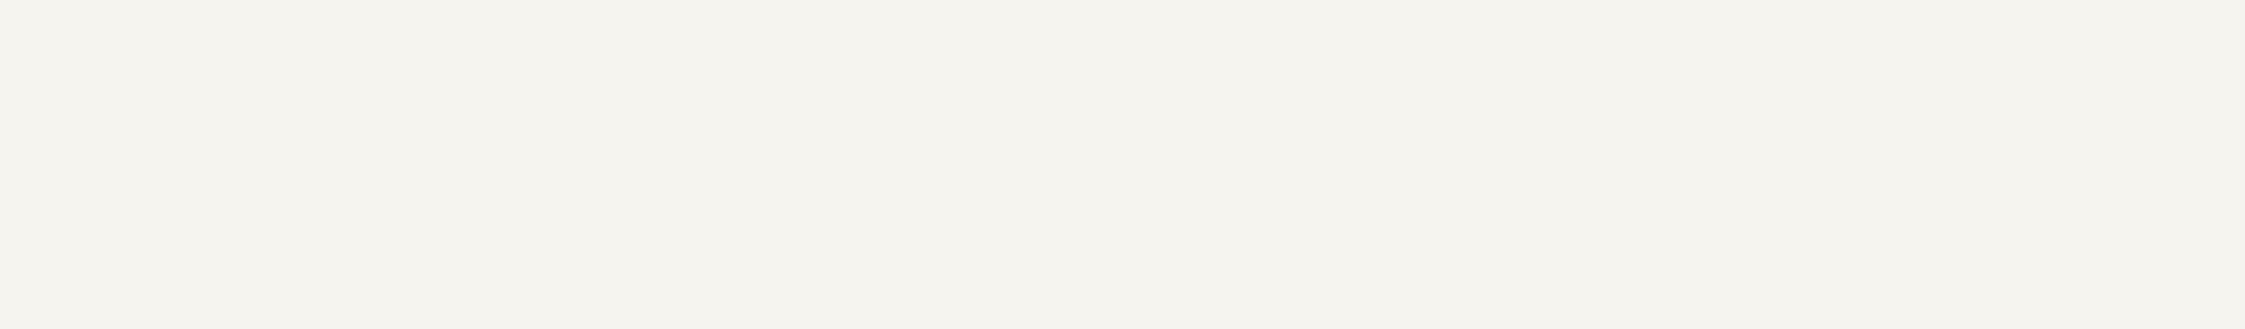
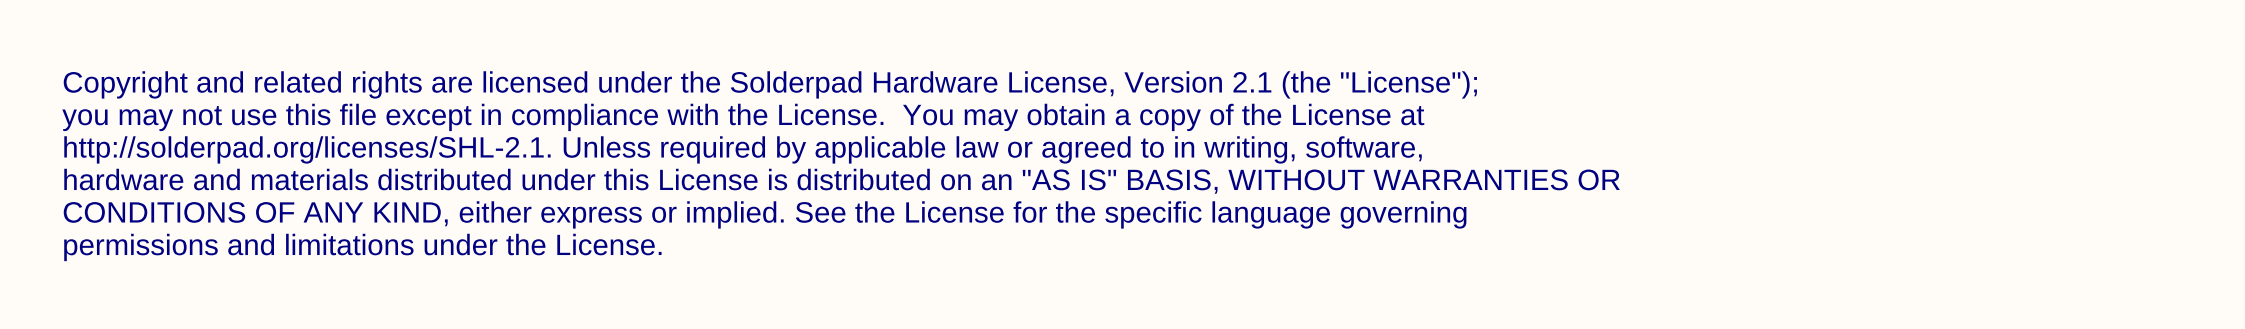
text: none -> Copyright and related rights are licensed under the Solderpad Hardware License, Version 2.1 (the "License"); (770, 84)
text: none -> you may not use this file except in compliance with the License. You may obtain a copy of the License at (743, 117)
text: none -> http://solderpad.org/licenses/SHL-2.1. Unless required by applicable law or agreed to in writing, software, (743, 149)
text: none -> hardware and materials distributed under this License is distributed on an "AS IS" BASIS, WITHOUT WARRANTIES OR (842, 181)
text: none -> CONDITIONS OF ANY KIND, either express or implied. See the License for the specific language governing (765, 214)
text: none -> permissions and limitations under the License. (362, 247)

